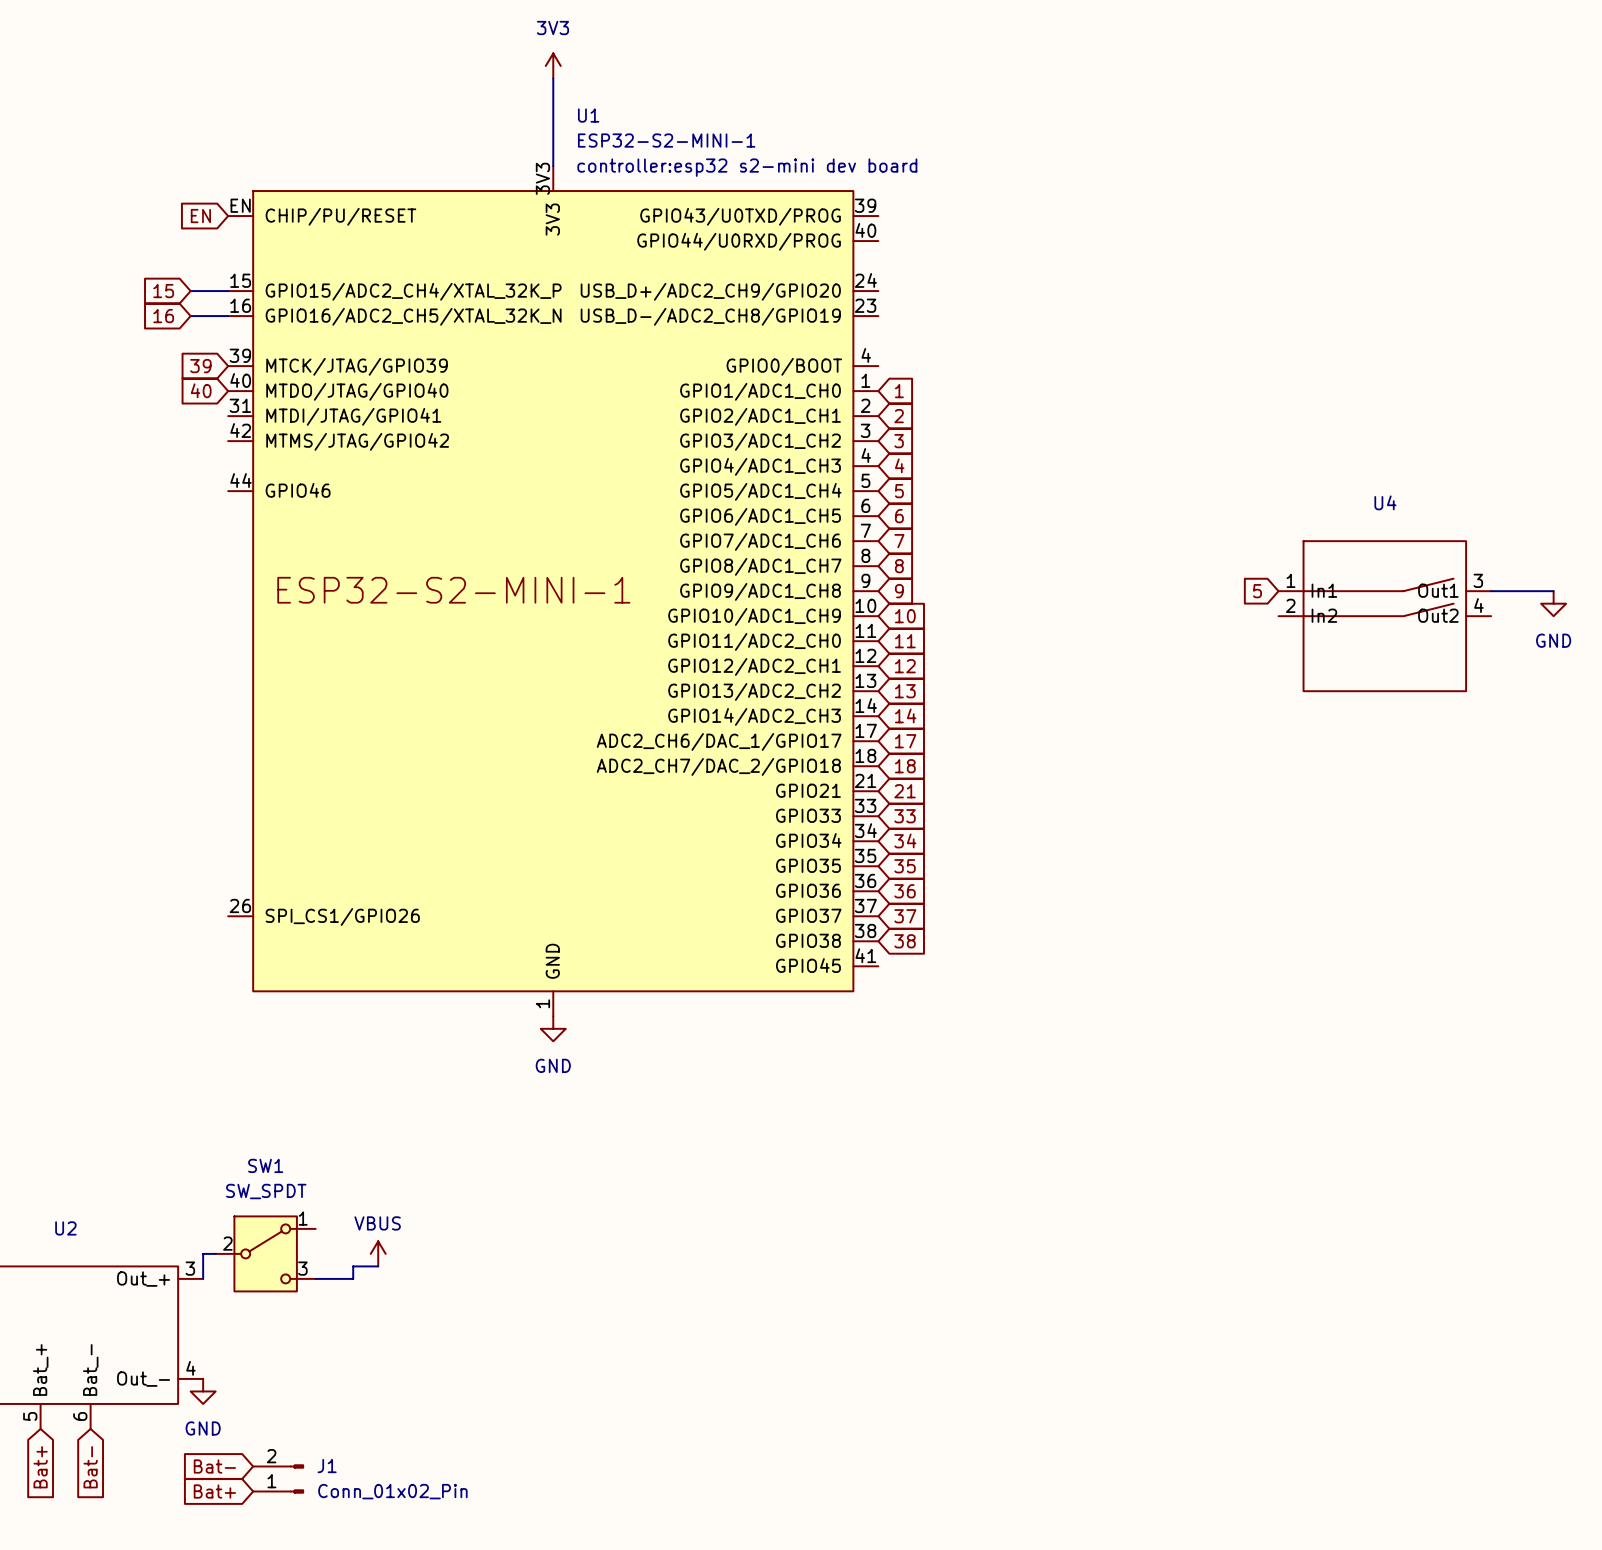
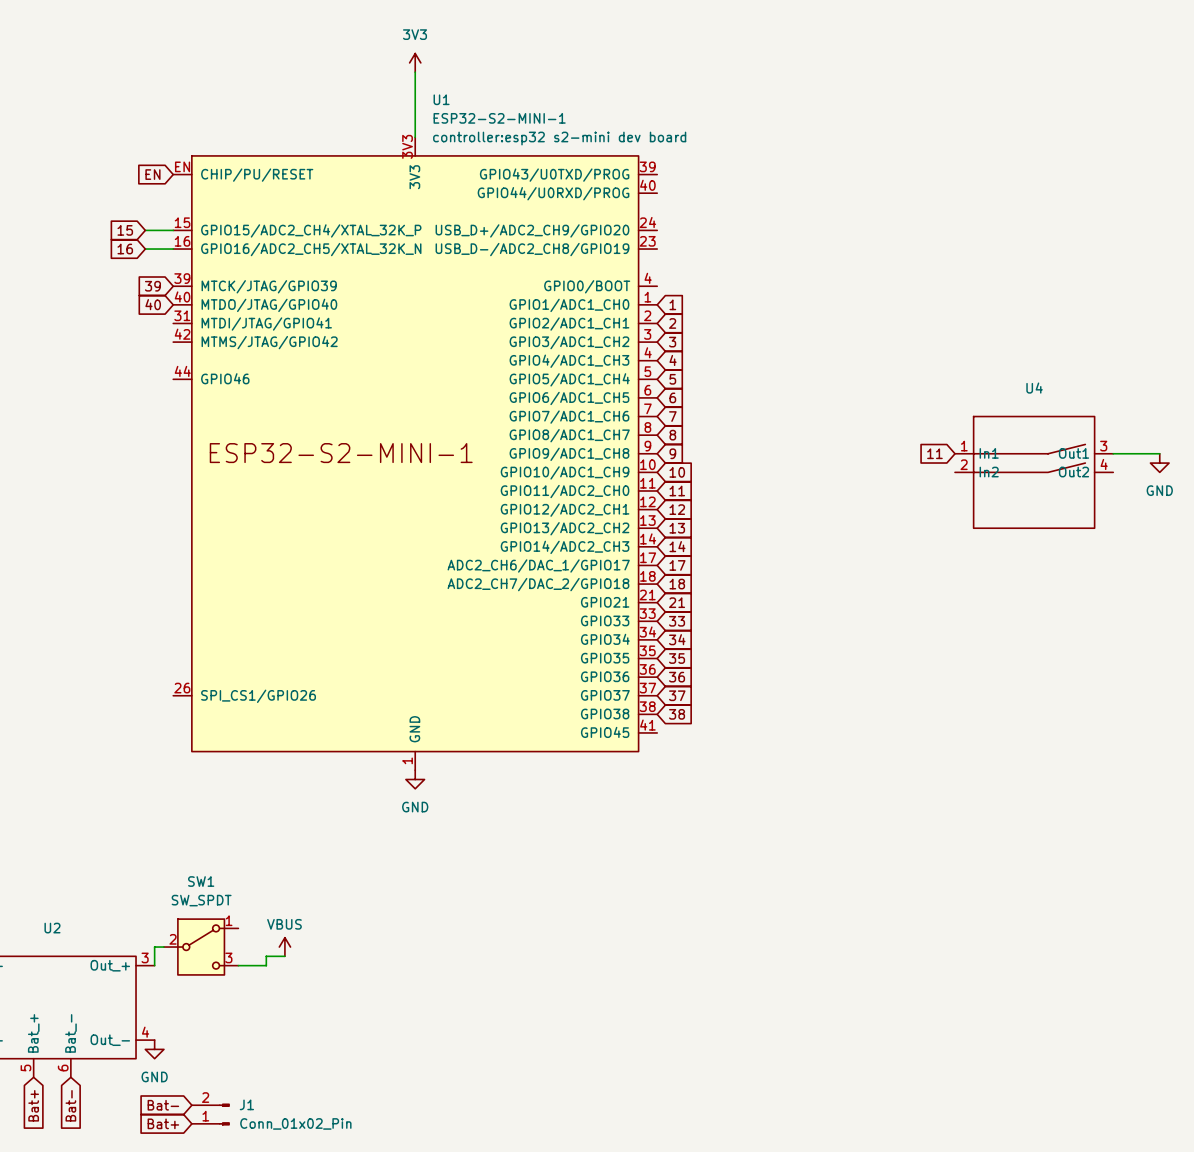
global label: 5 (1257, 591) -> 11 (934, 453)

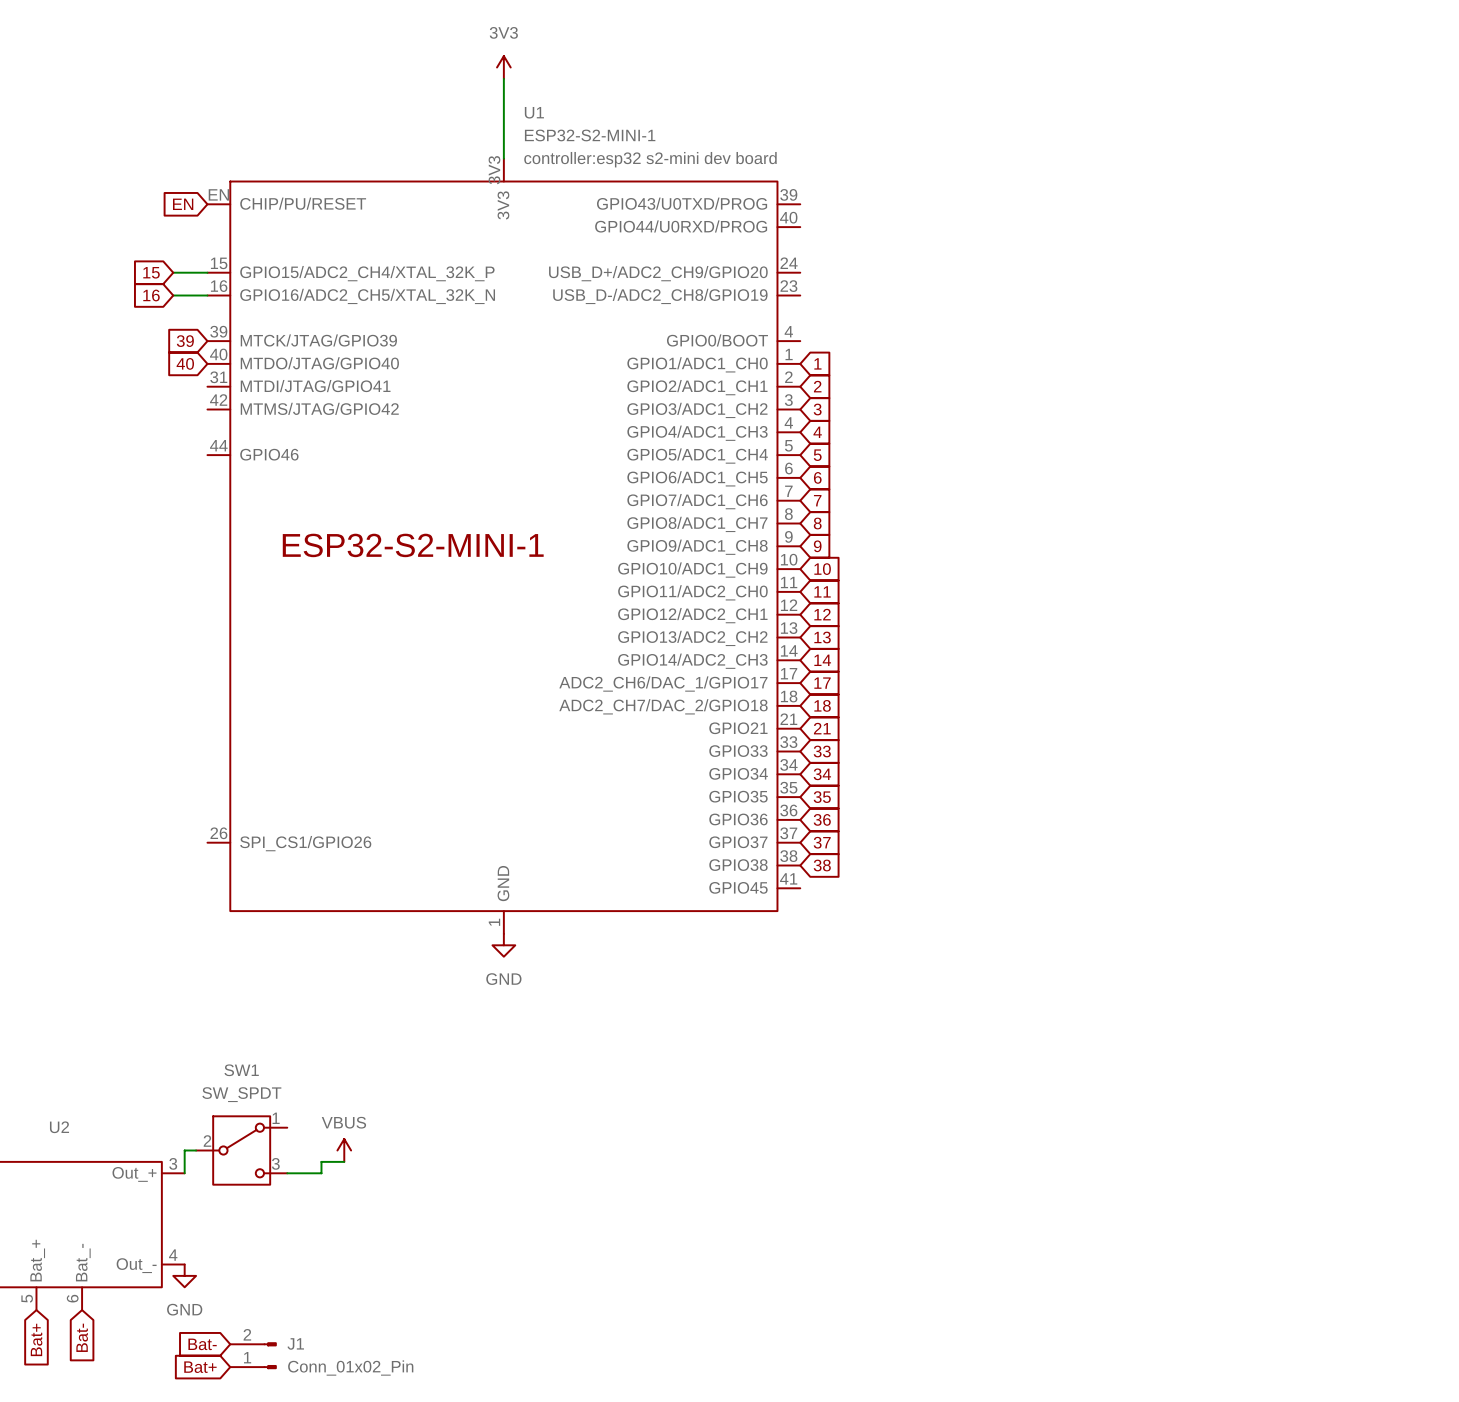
global label: 11 (934, 453) -> none
wire: (1113, 453) (1159, 453) -> none
power symbol: GND (1159, 463) -> none
U4: (1034, 472) -> none

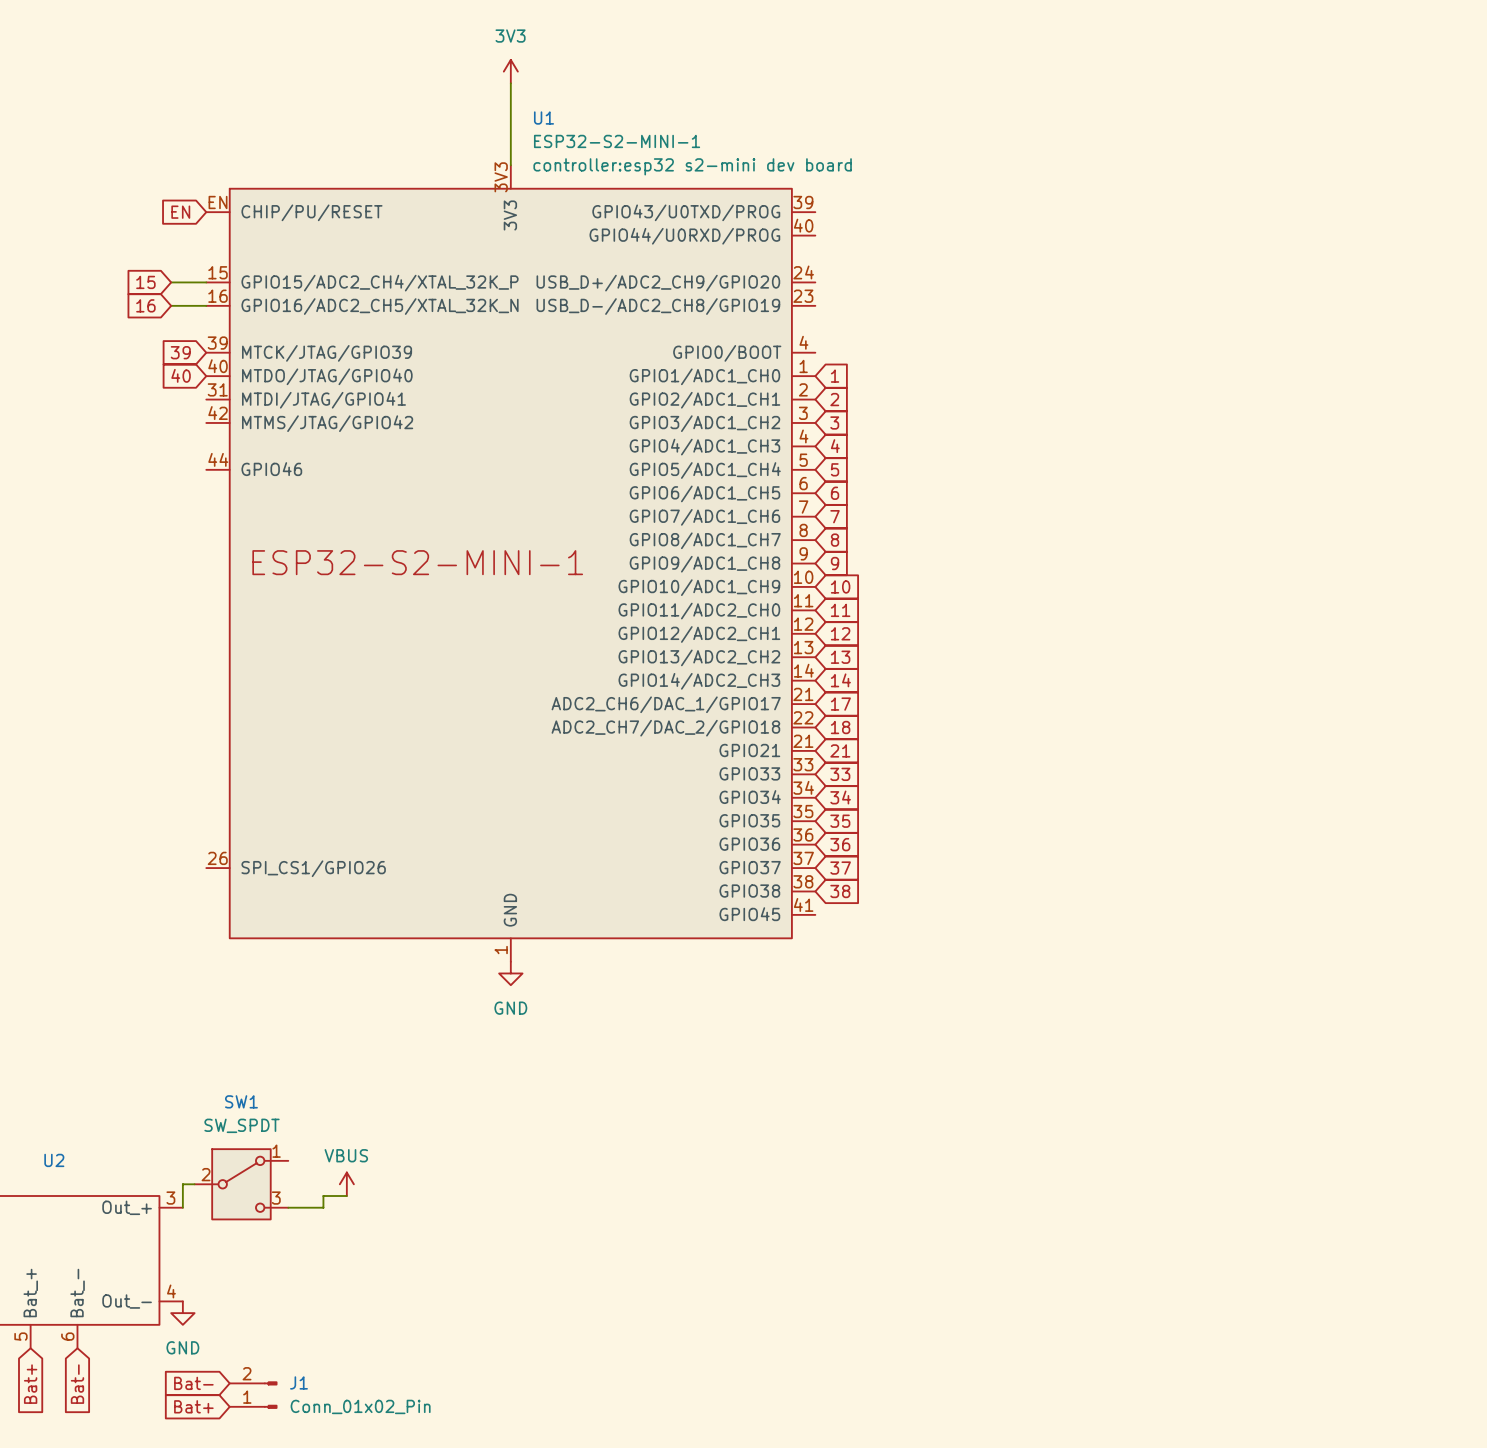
U1 pin number: 17 (789, 673) -> 21 (803, 694)
U1 pin number: 18 (789, 696) -> 22 (803, 717)

